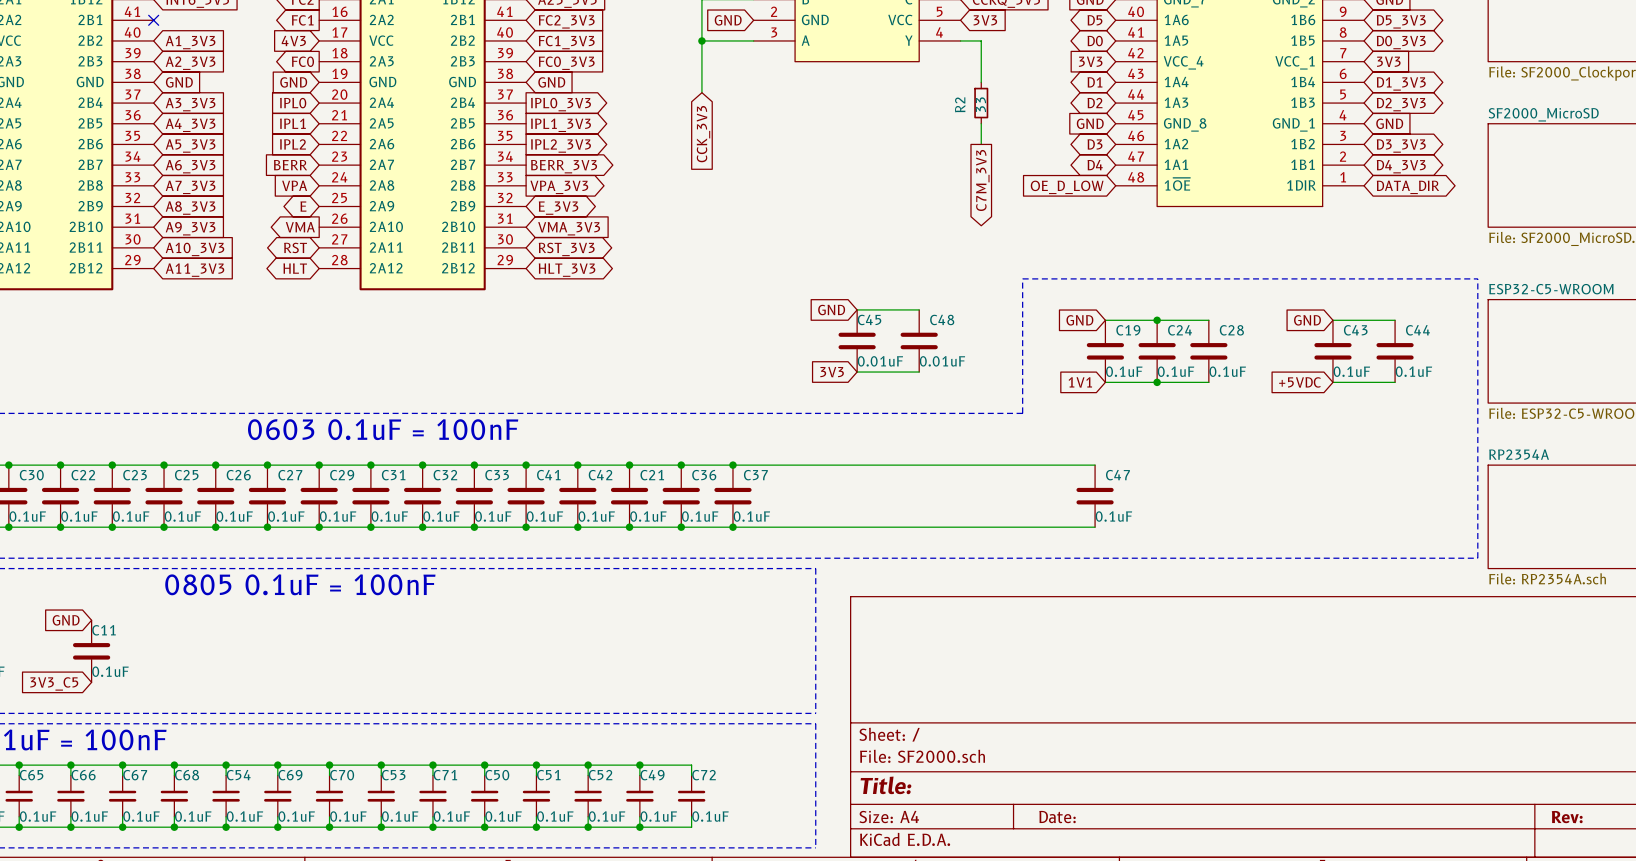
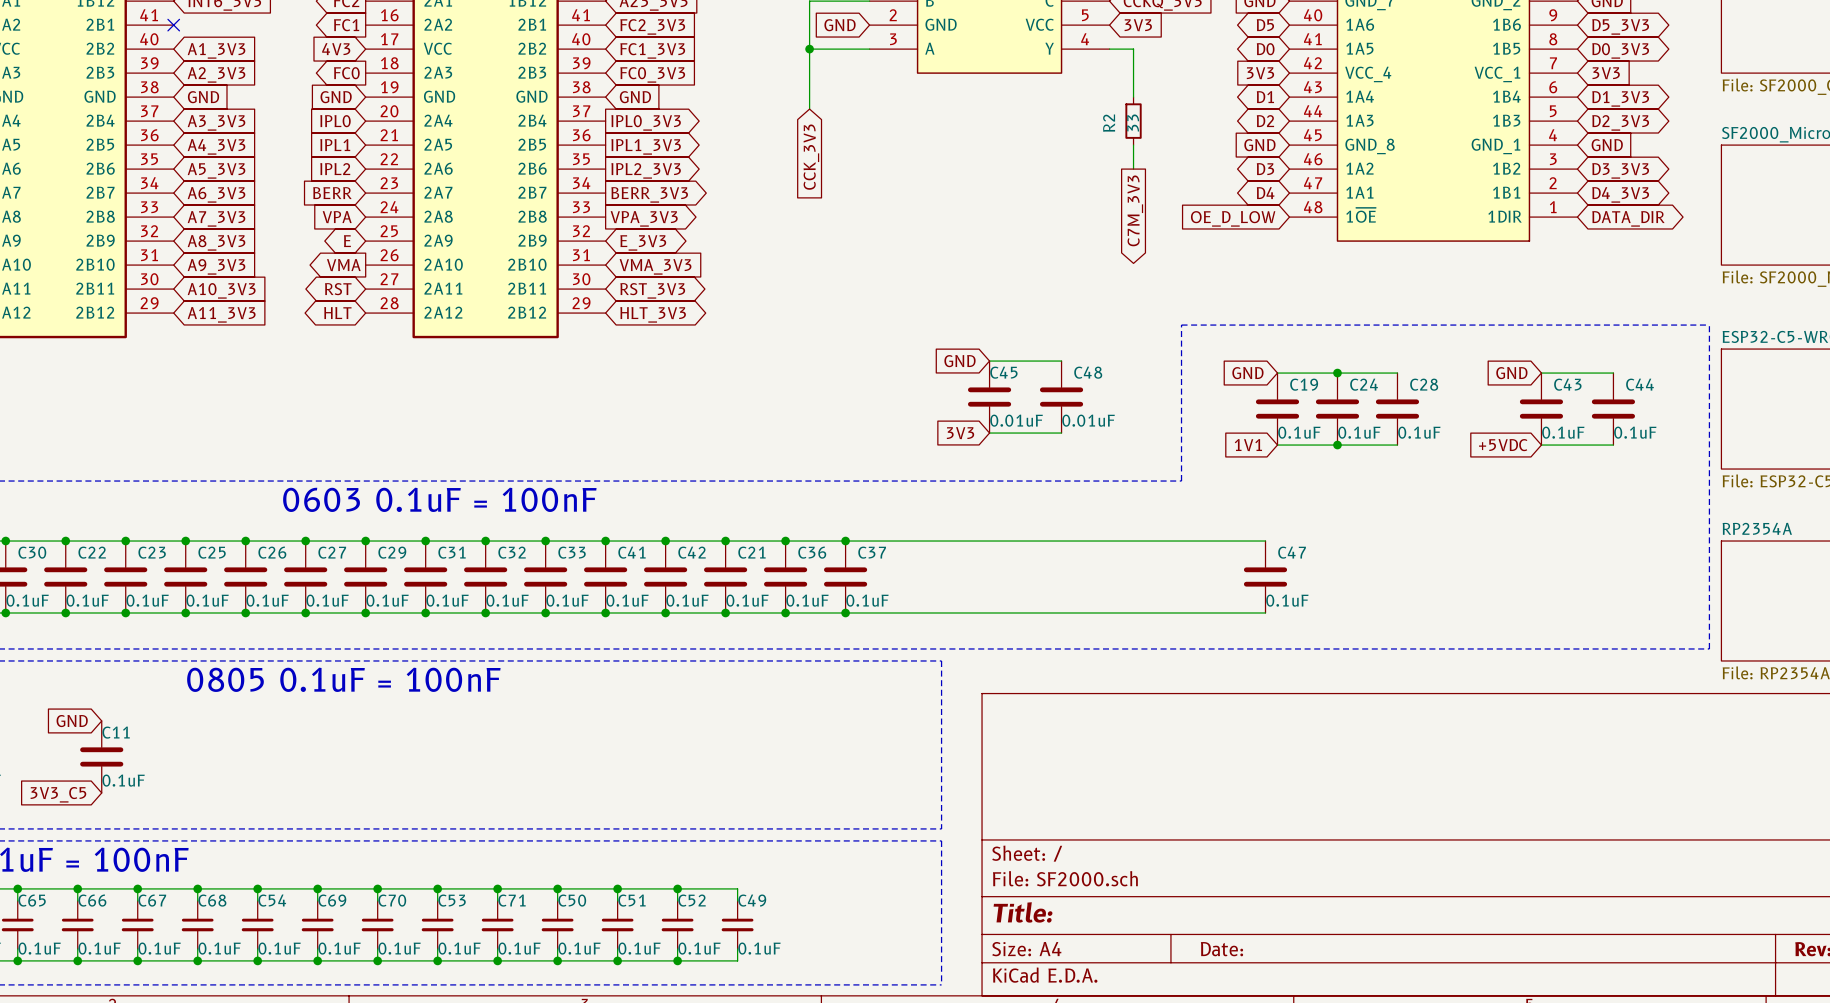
wire: (639, 765) (691, 765) (691, 775) -> none
junction: (639, 765) -> none
C72: 0.1uF (691, 796) -> none
wire: (691, 816) (691, 827) (639, 827) -> none
junction: (639, 827) -> none

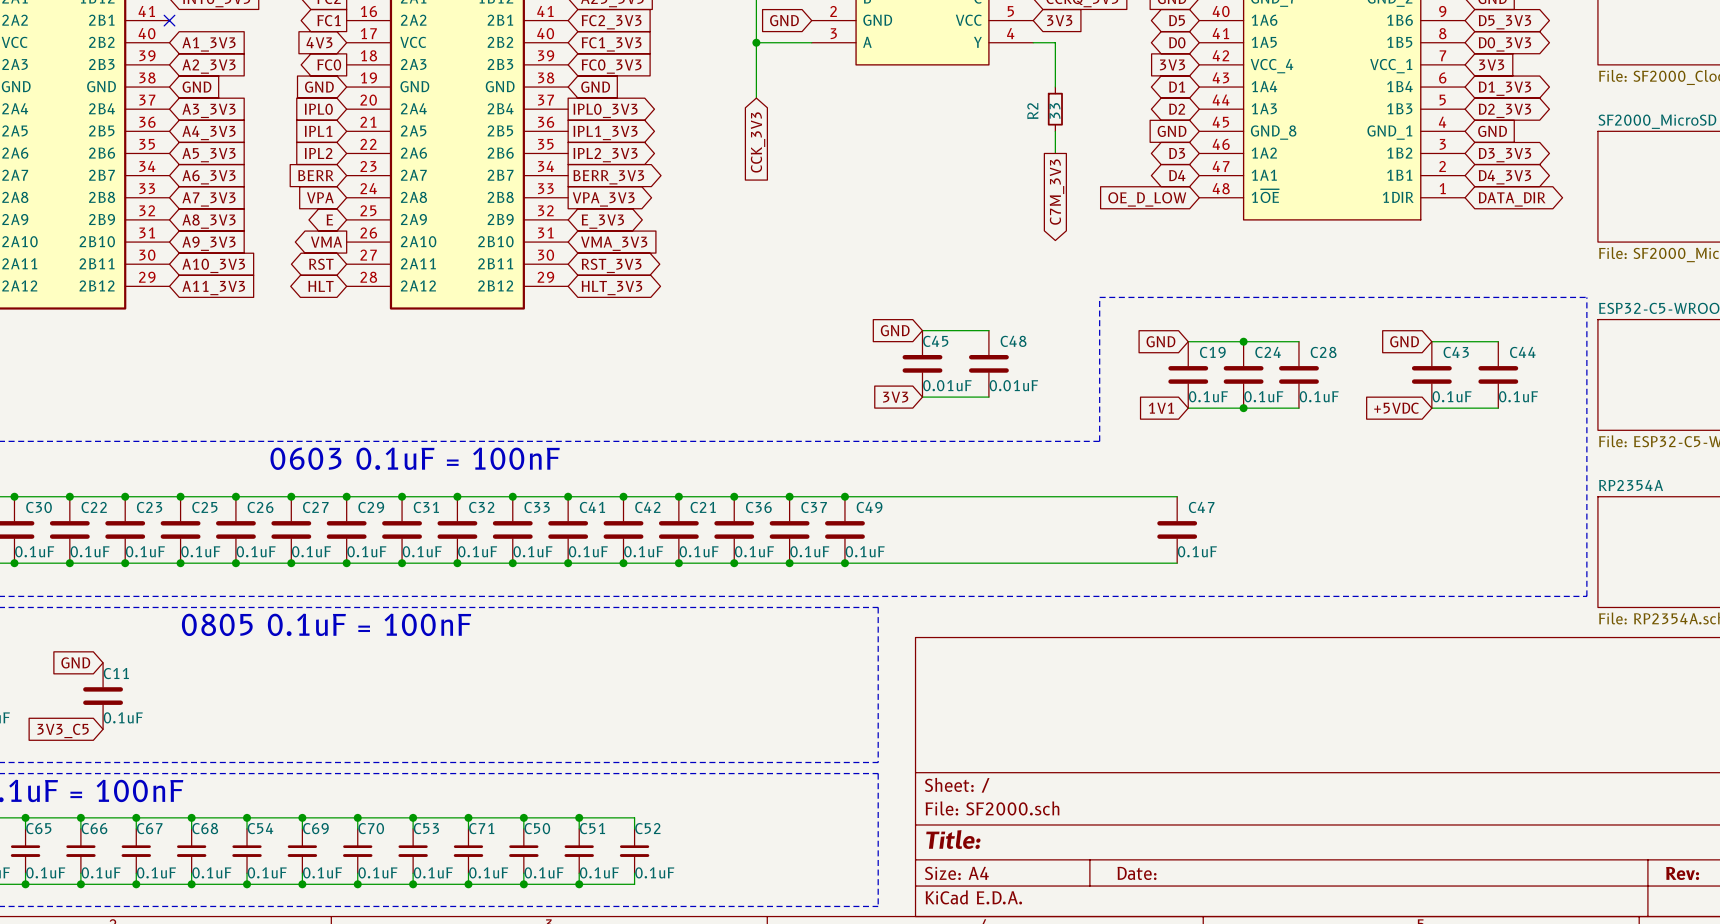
junction: none -> (844, 496)
junction: none -> (844, 563)
wire: (677, 888) (737, 888) (737, 900) -> none
junction: (677, 888) -> none
C49 symbol: [721, 900, 754, 949] -> [825, 496, 865, 564]
wire: (737, 948) (737, 960) (677, 960) -> none
junction: (677, 960) -> none

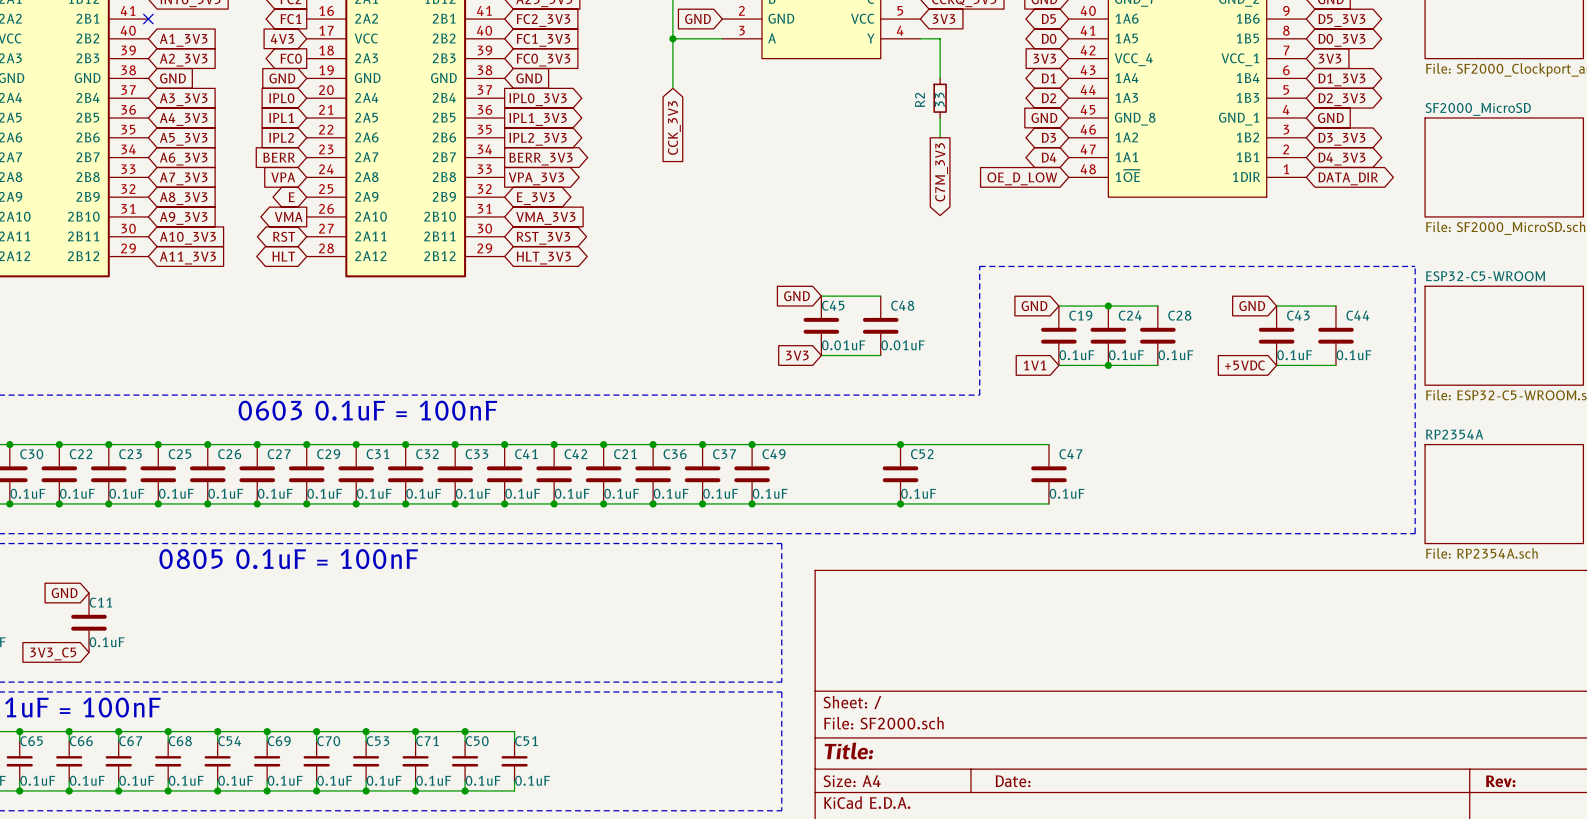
junction: none -> (900, 444)
junction: none -> (900, 503)
wire: (579, 817) (634, 817) (634, 828) -> none
junction: (579, 817) -> none
C52 symbol: [619, 828, 650, 874] -> [882, 444, 919, 504]
wire: (634, 873) (634, 884) (579, 884) -> none
junction: (579, 884) -> none

